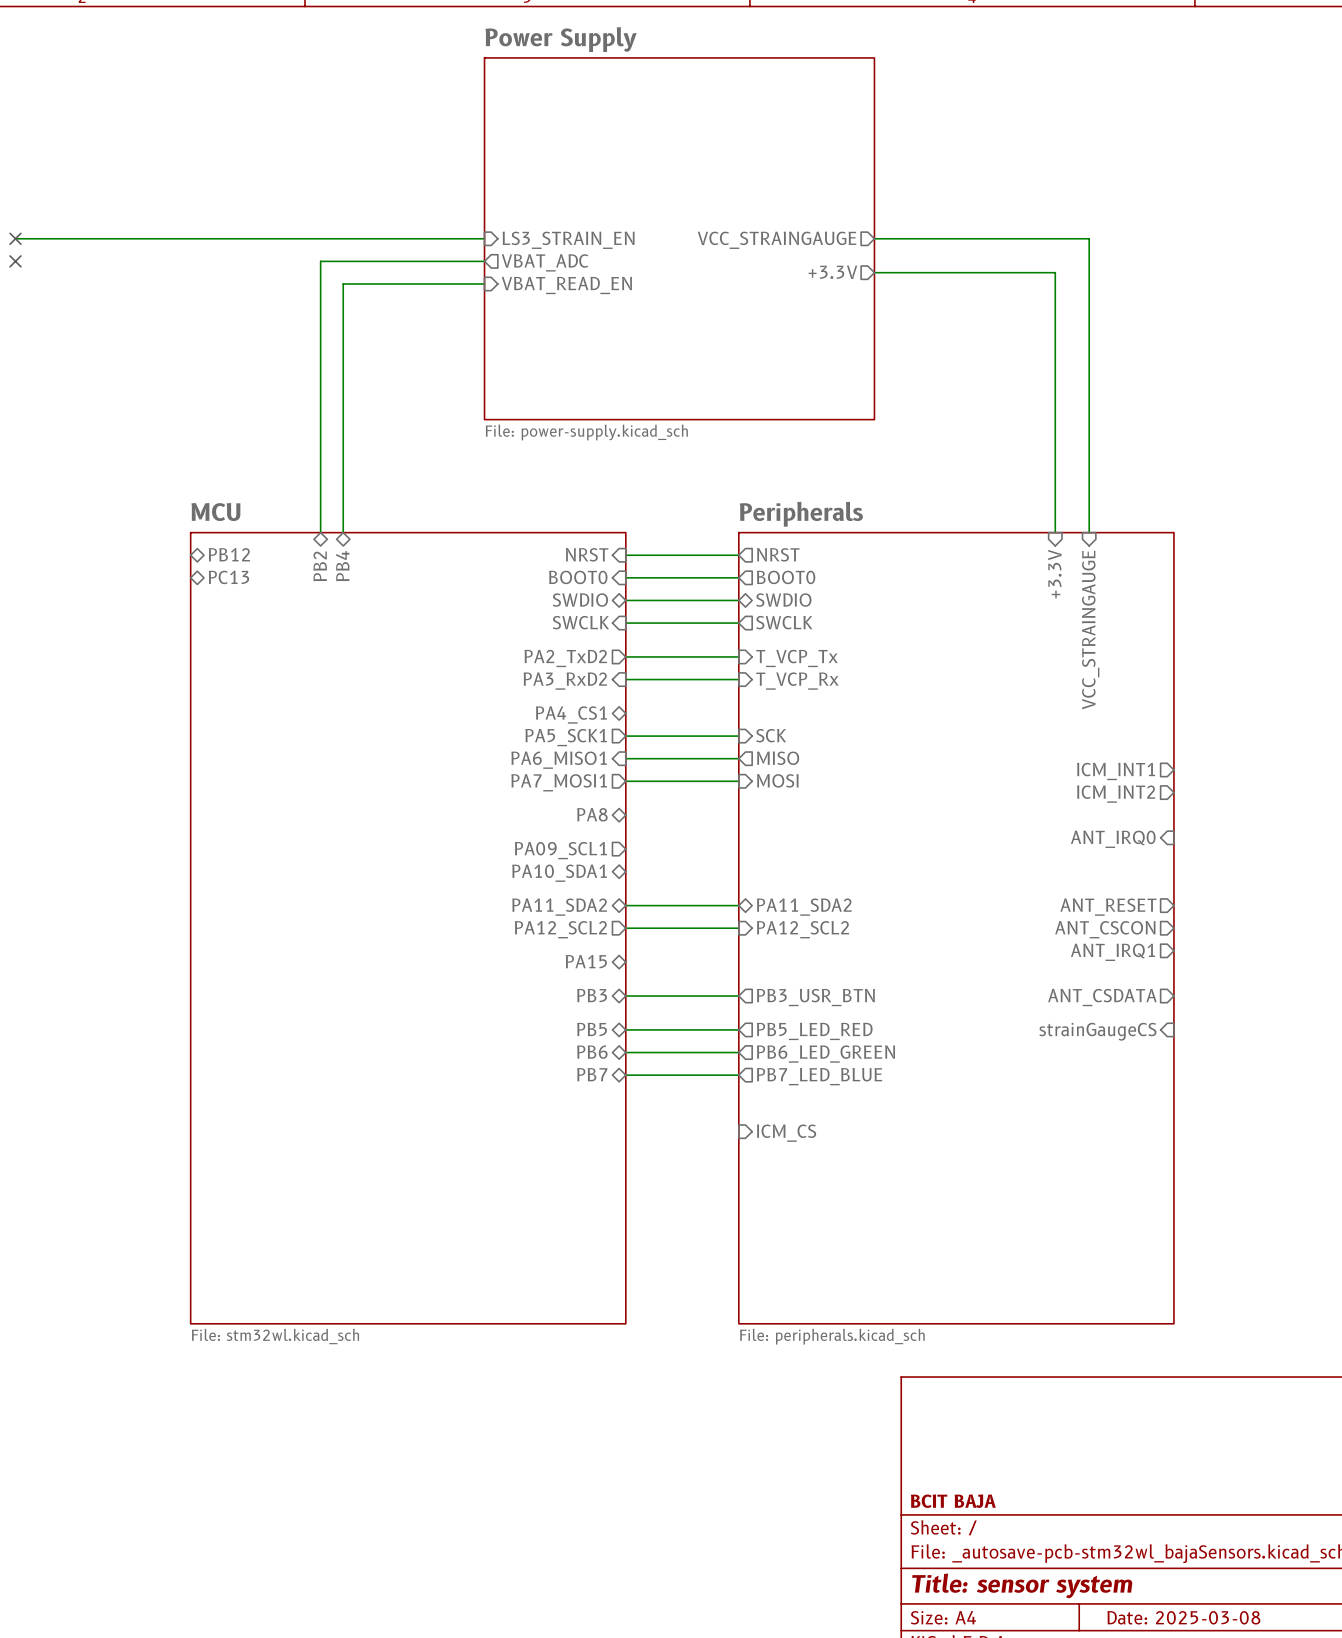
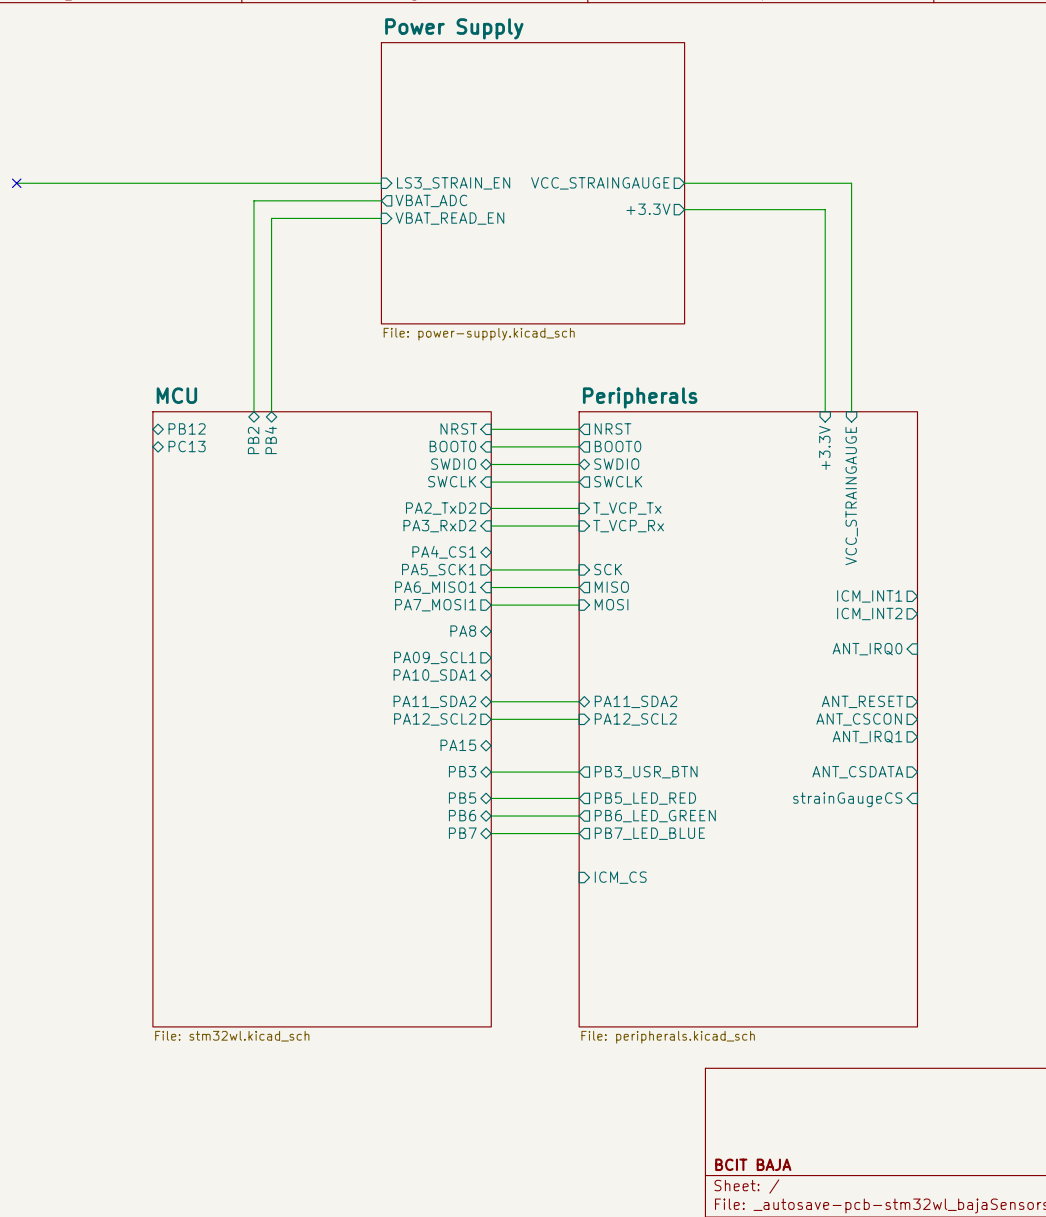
no-connect mark: (15, 261) -> none

